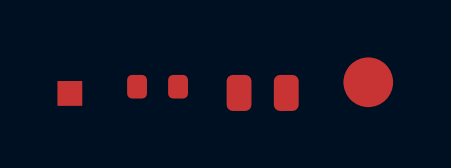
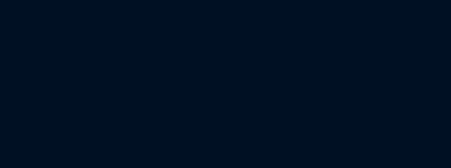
part: (368, 82) -> none
part: (157, 86) -> none
part: (262, 92) -> none
part: (69, 93) -> none

